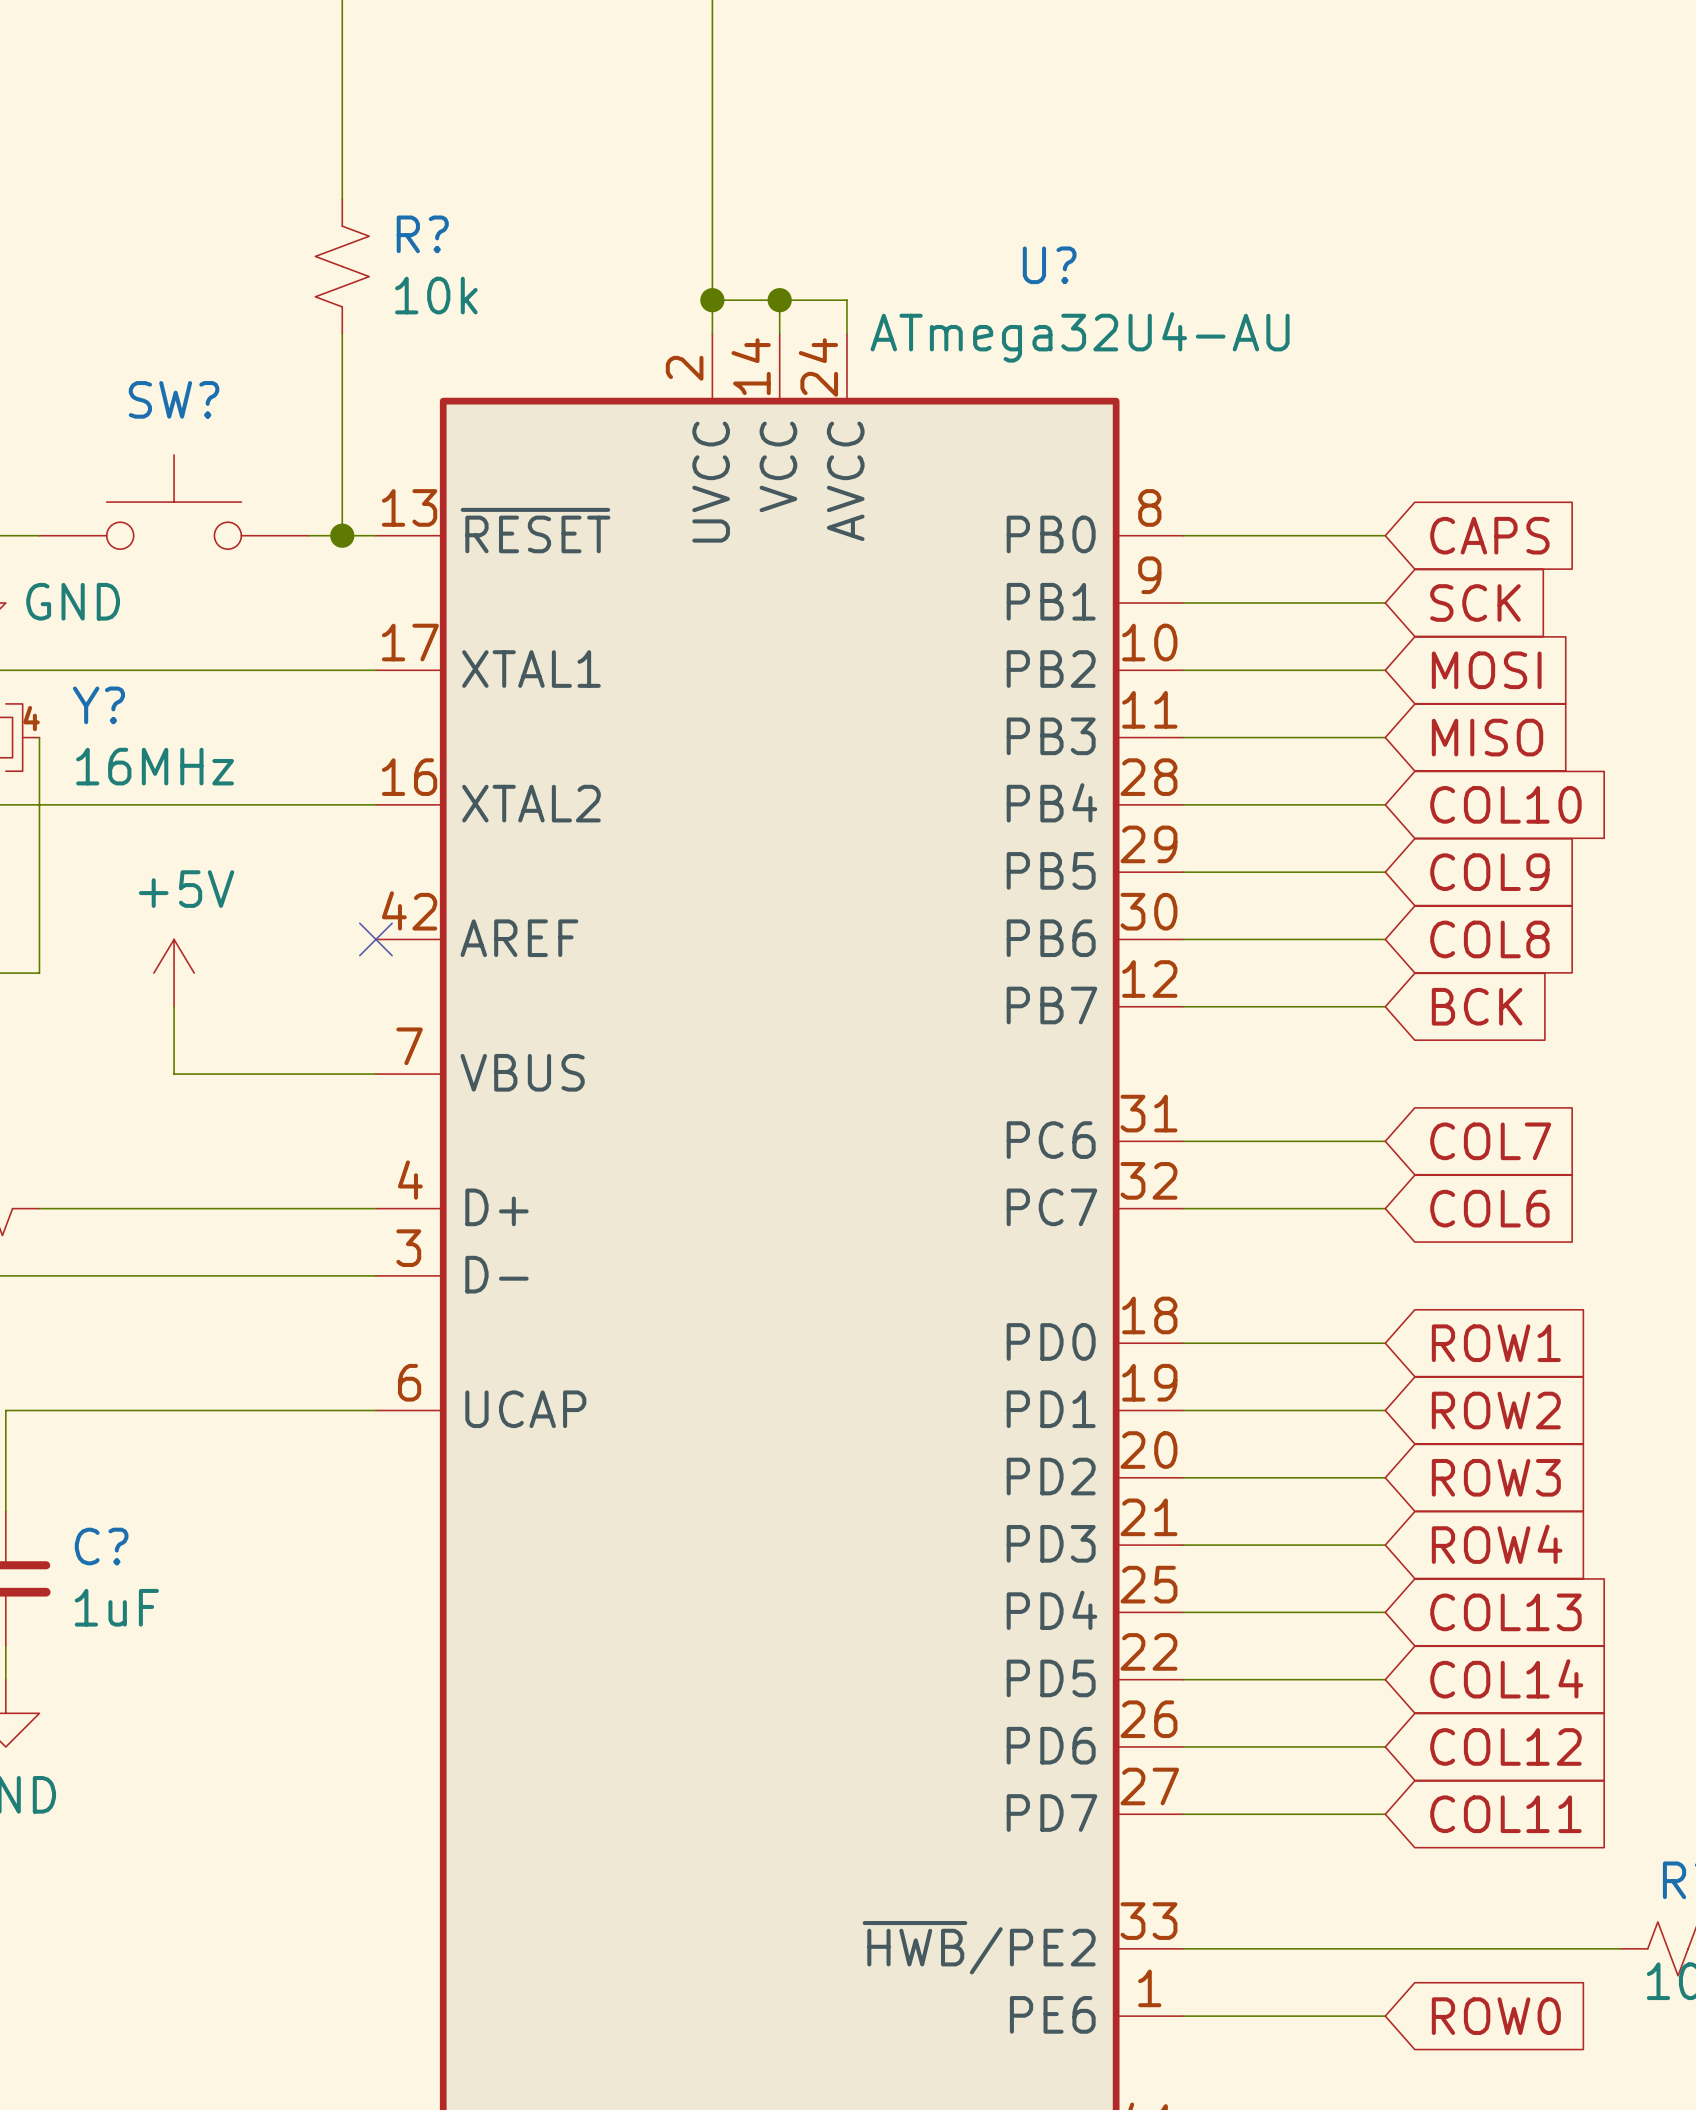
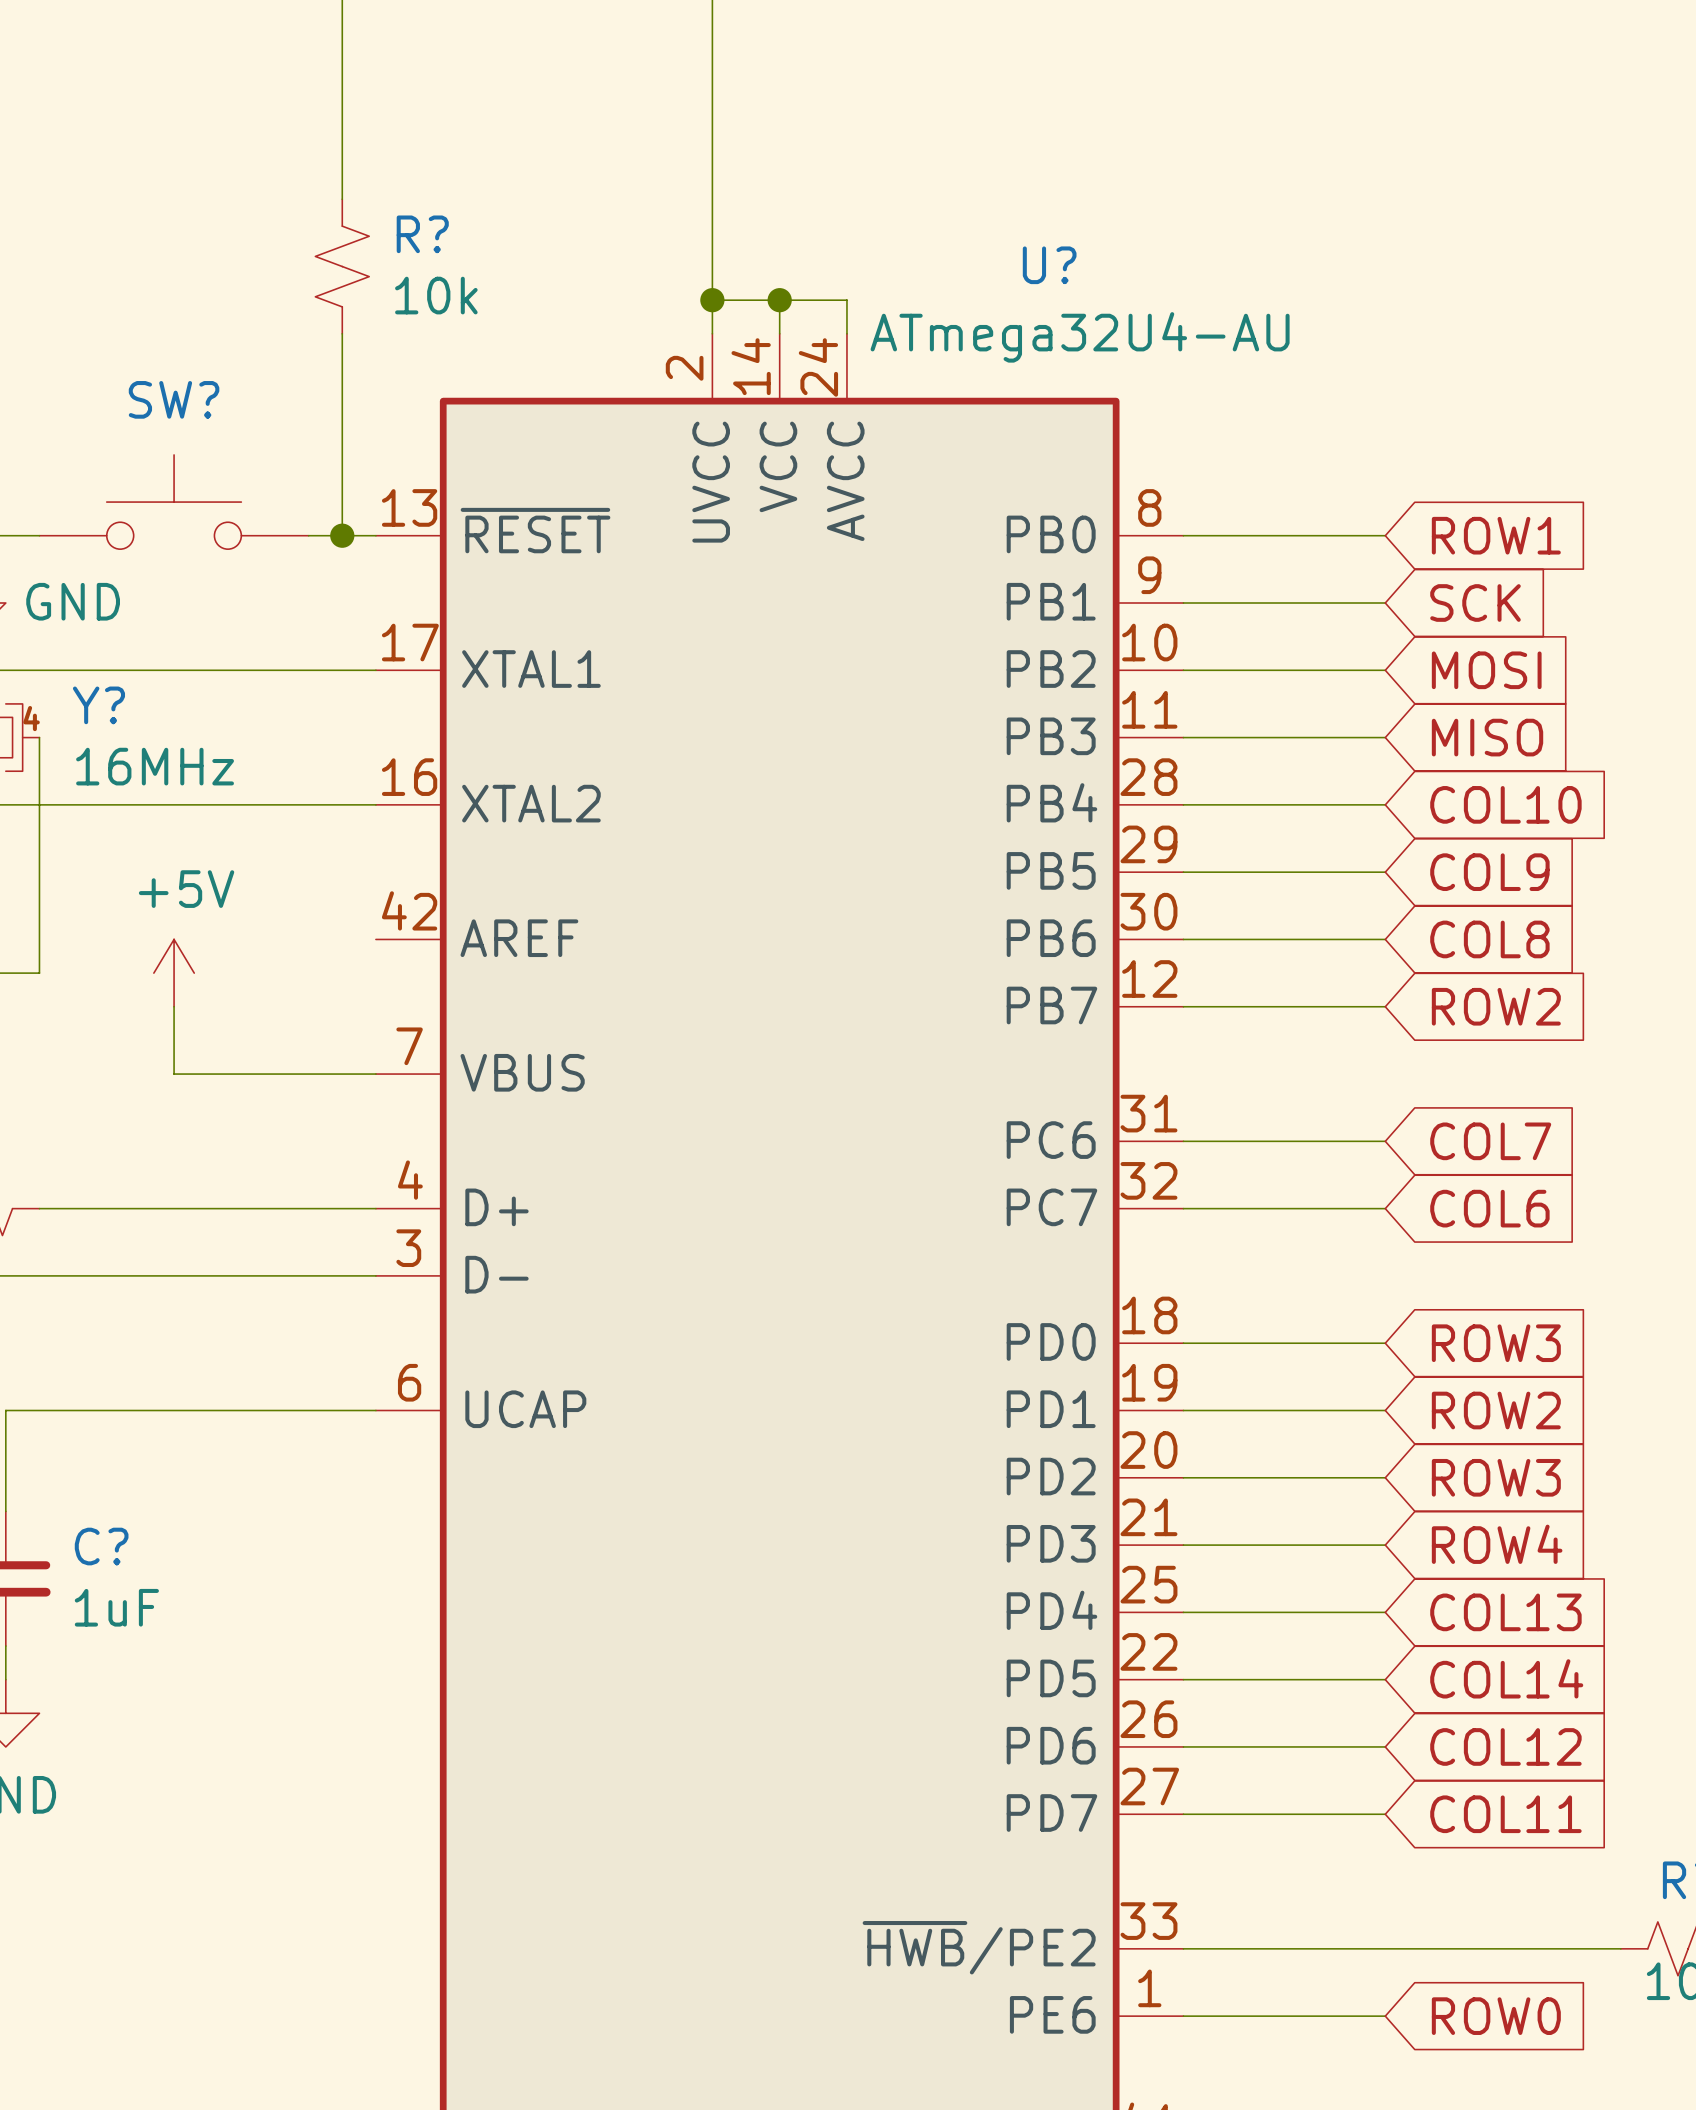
global label: CAPS (1489, 535) -> ROW1 (1496, 535)
no-connect mark: (375, 939) -> none
global label: BCK (1477, 1006) -> ROW2 (1496, 1006)
global label: ROW1 (1496, 1343) -> ROW3 (1496, 1343)

